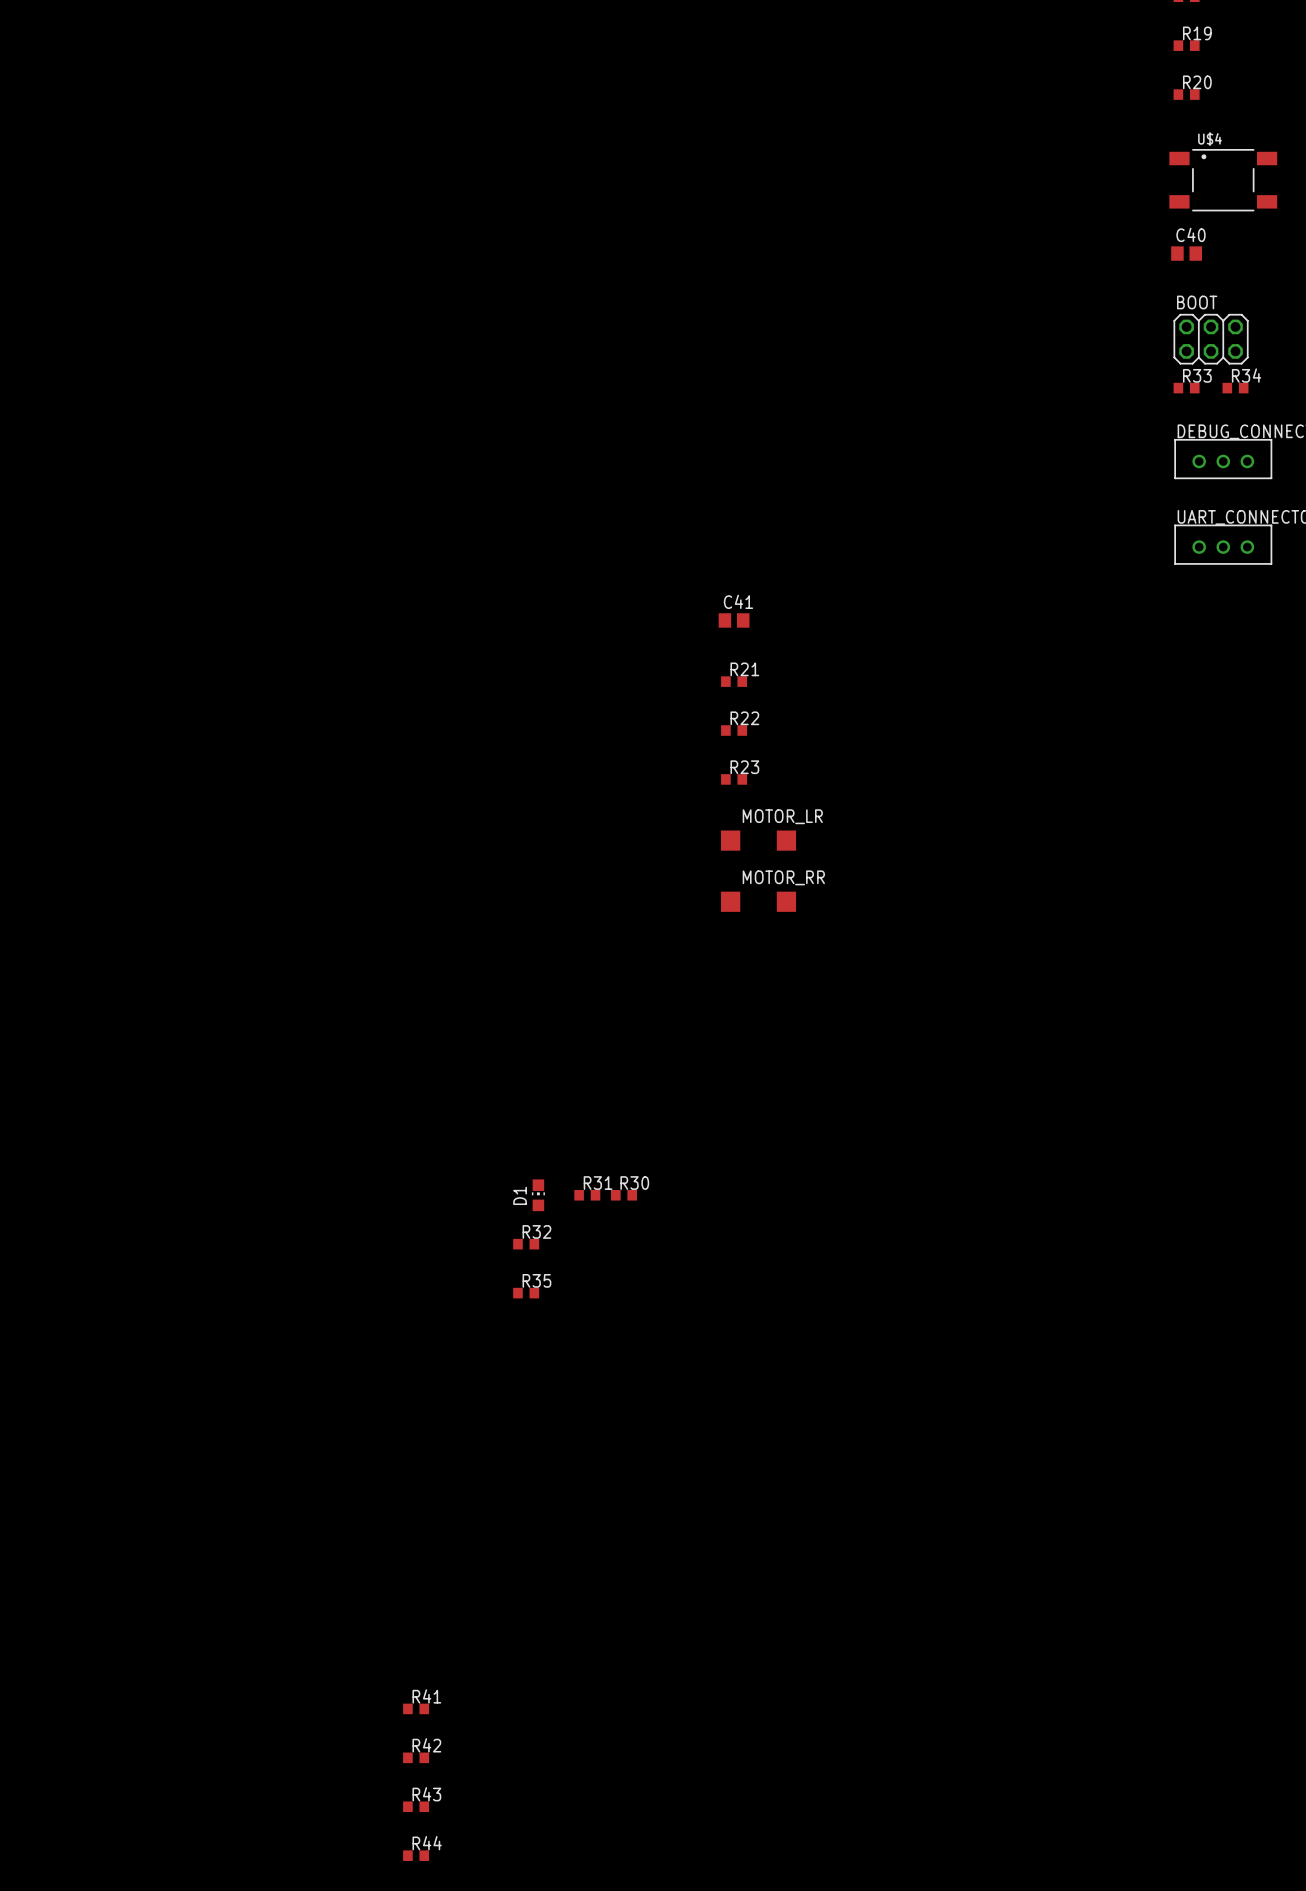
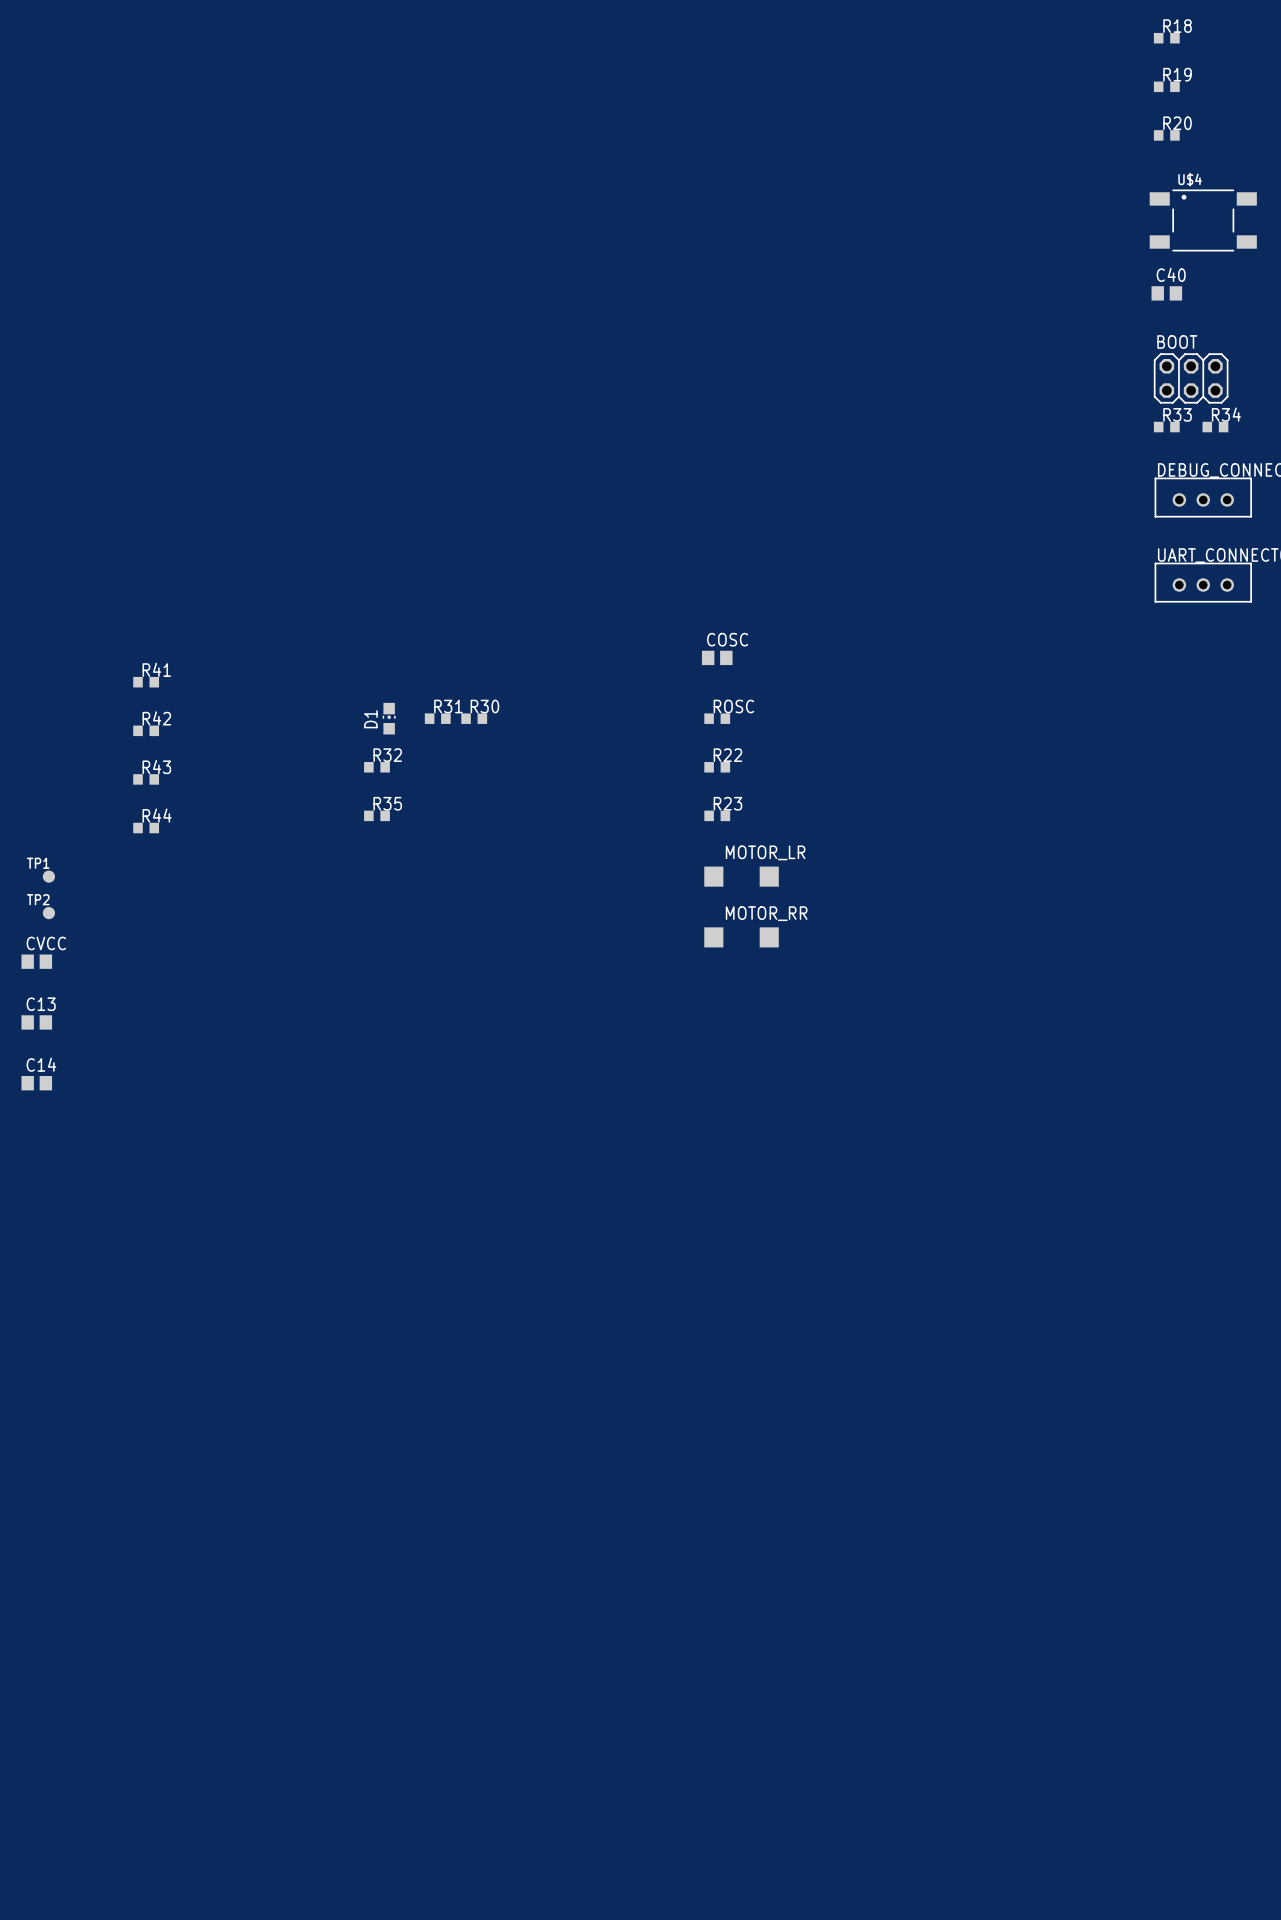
C41 name: C41 (738, 601) -> COSC (727, 639)
R21 name: R21 (744, 669) -> ROSC (733, 706)
TP1: none -> (48, 876)
TP2: none -> (48, 913)
CVCC: none -> (36, 961)
C13: none -> (36, 1022)
C14: none -> (36, 1083)
D1 position: (538, 1195) -> (389, 718)
R31 position: (587, 1195) -> (437, 718)
R30 position: (624, 1195) -> (474, 718)
R32 position: (526, 1244) -> (377, 767)
R35 position: (526, 1293) -> (377, 815)
R41 position: (416, 1708) -> (146, 682)
R42 position: (416, 1757) -> (146, 730)
R43 position: (416, 1806) -> (146, 779)
R44 position: (416, 1855) -> (146, 828)

